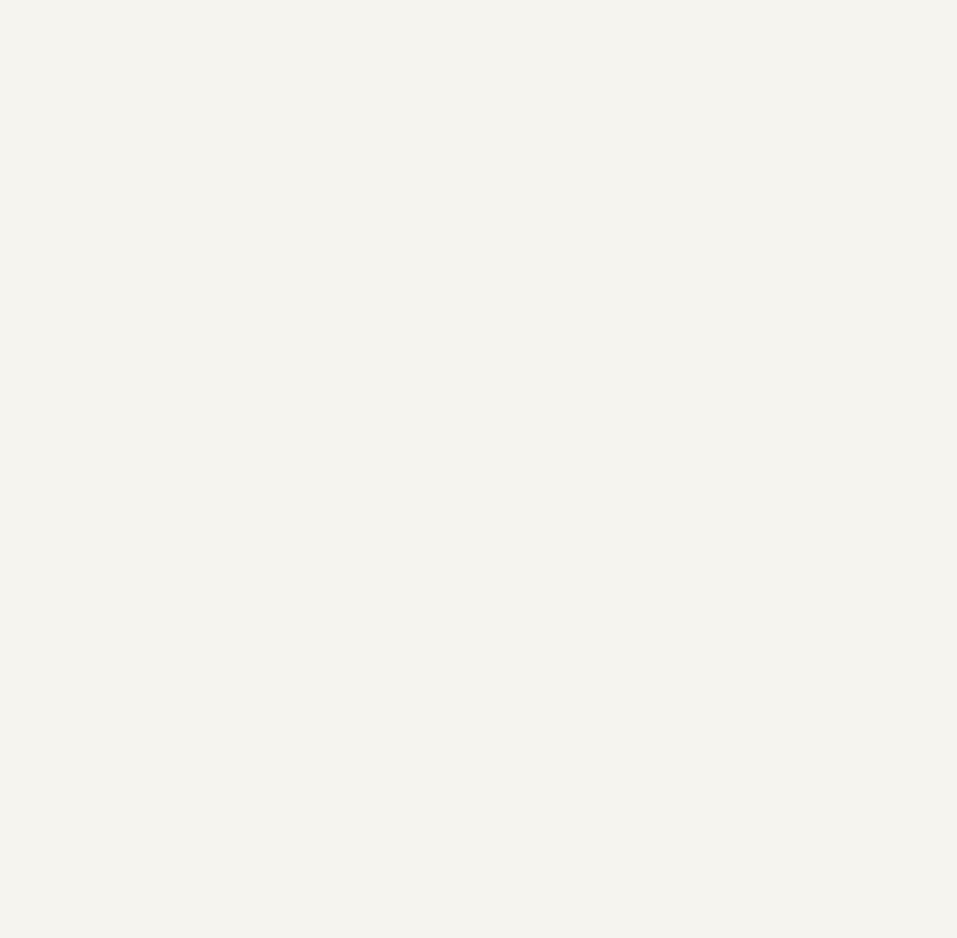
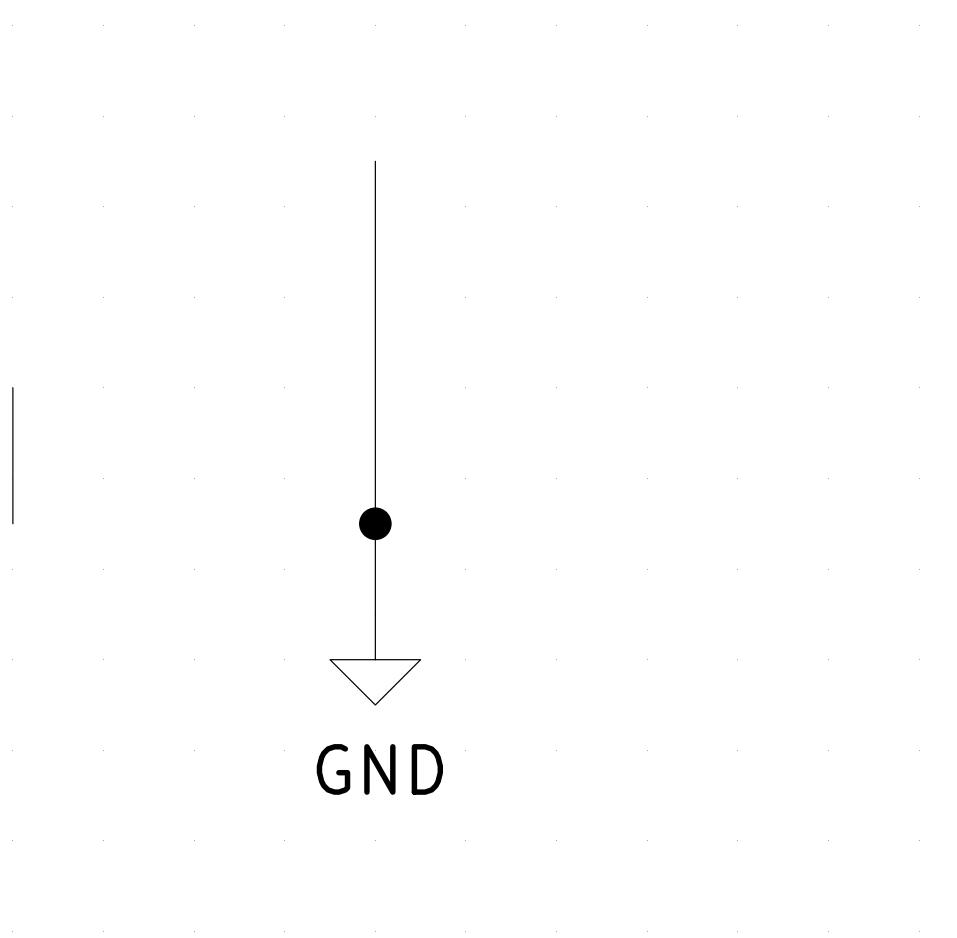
wire: none -> (375, 161) (375, 614)
wire: none -> (12, 387) (12, 523)
junction: none -> (375, 523)
power symbol: none -> GND (375, 659)

